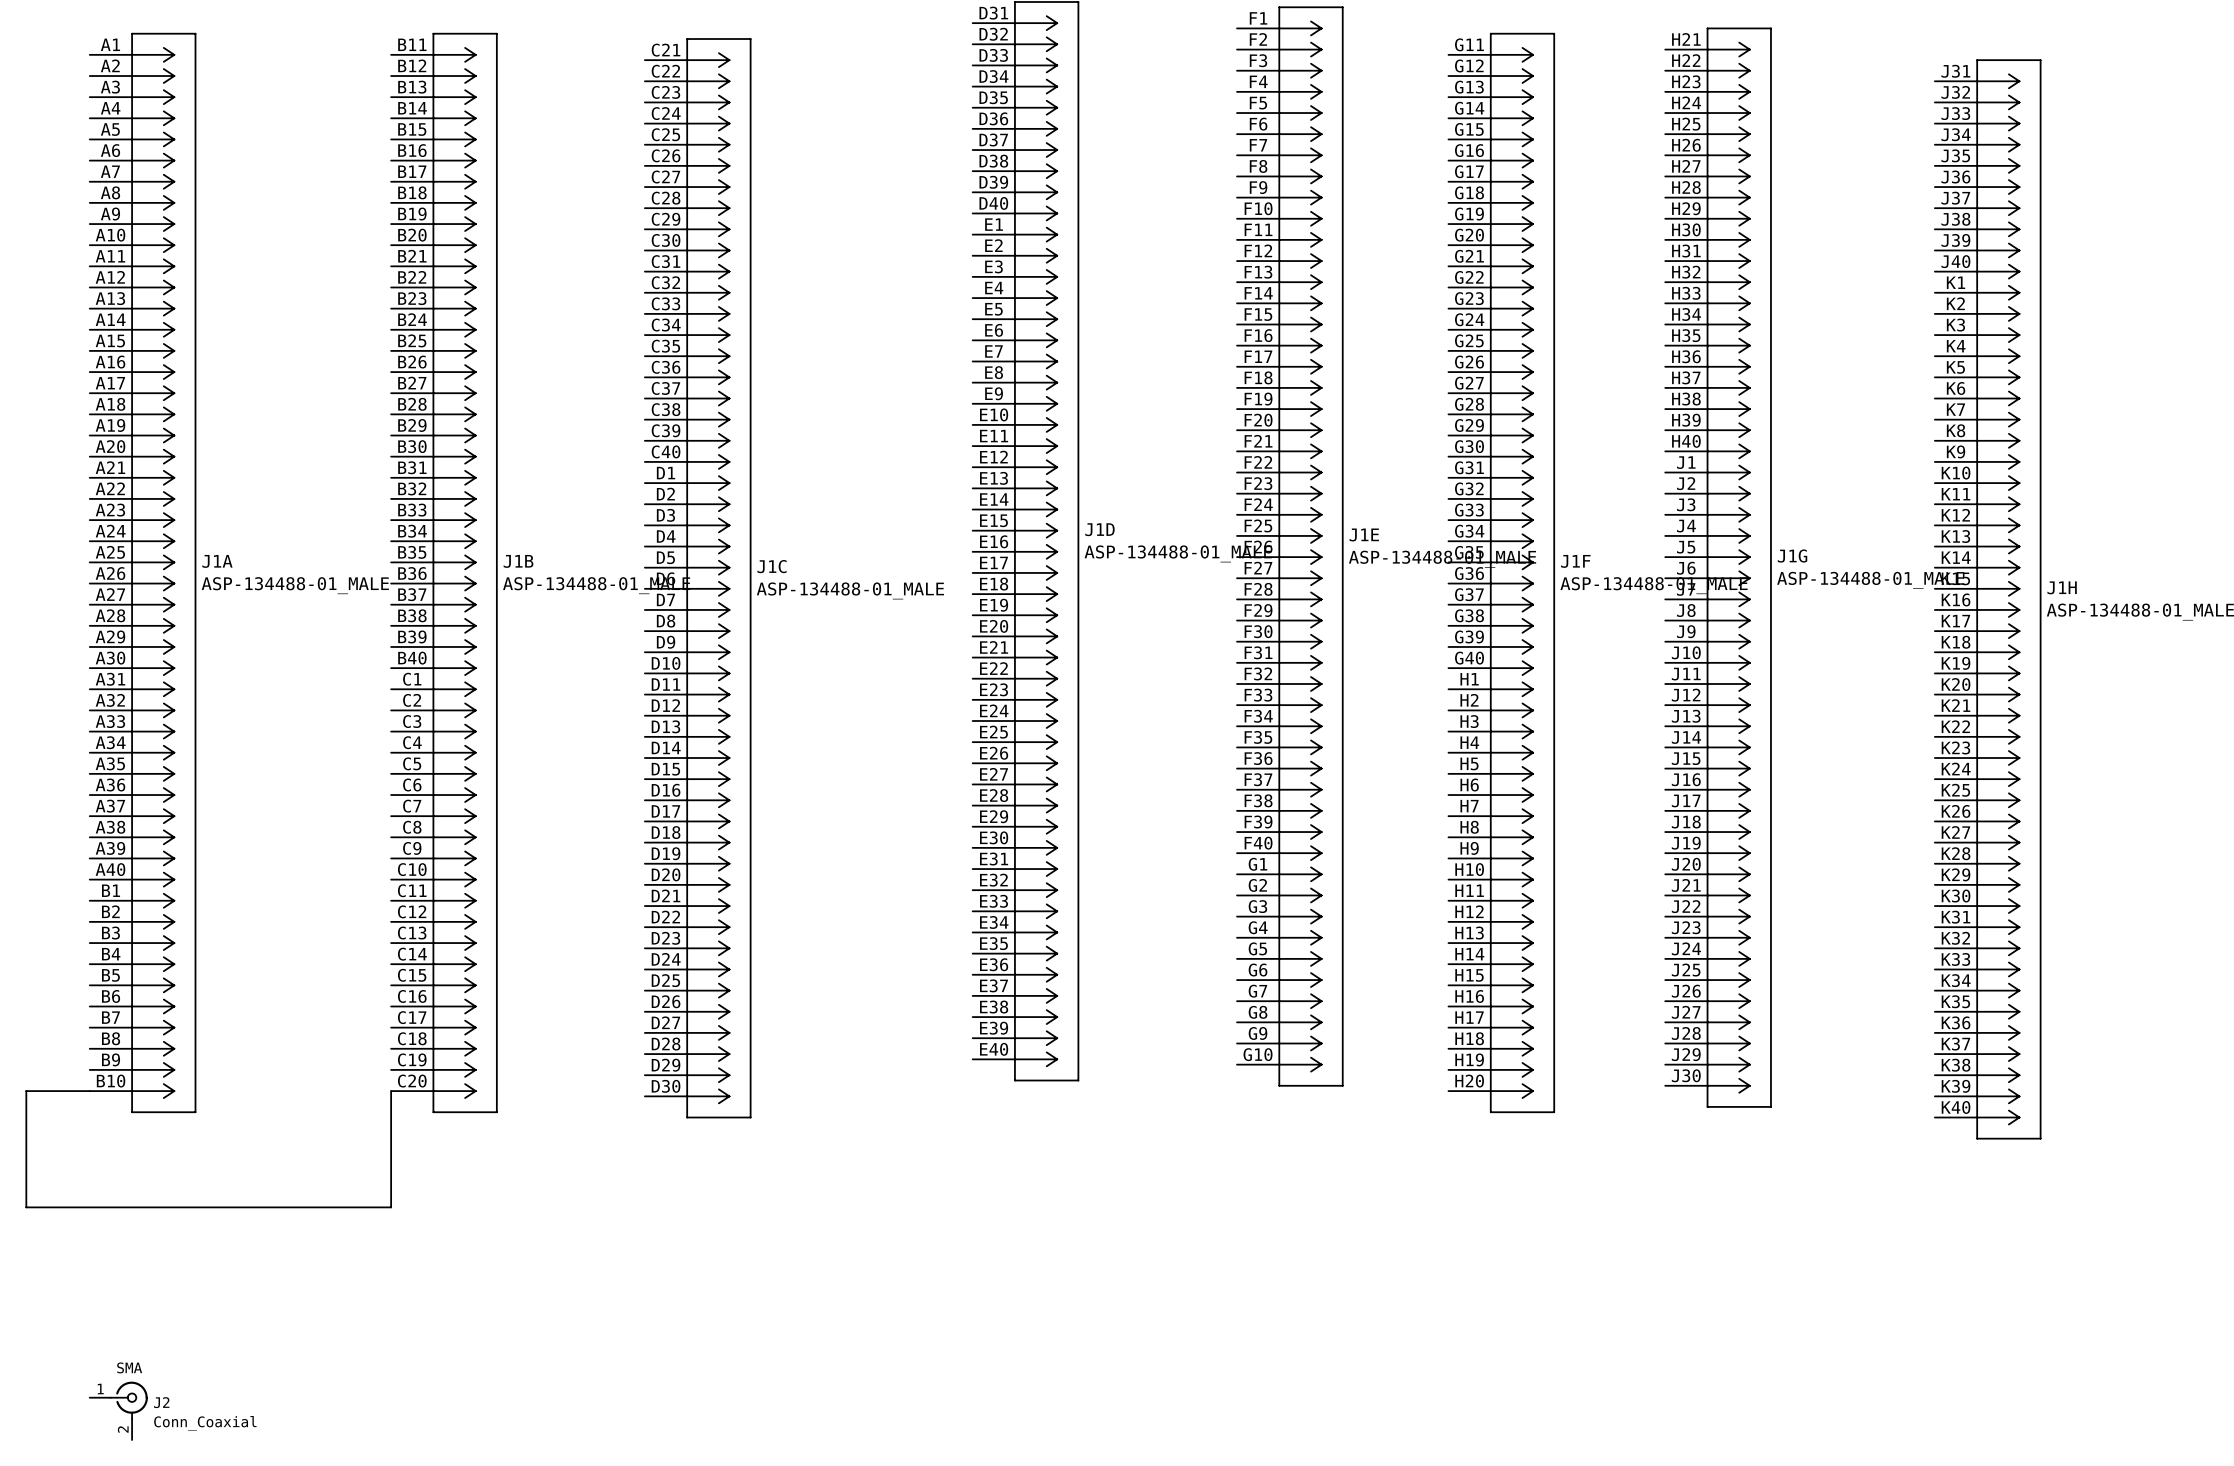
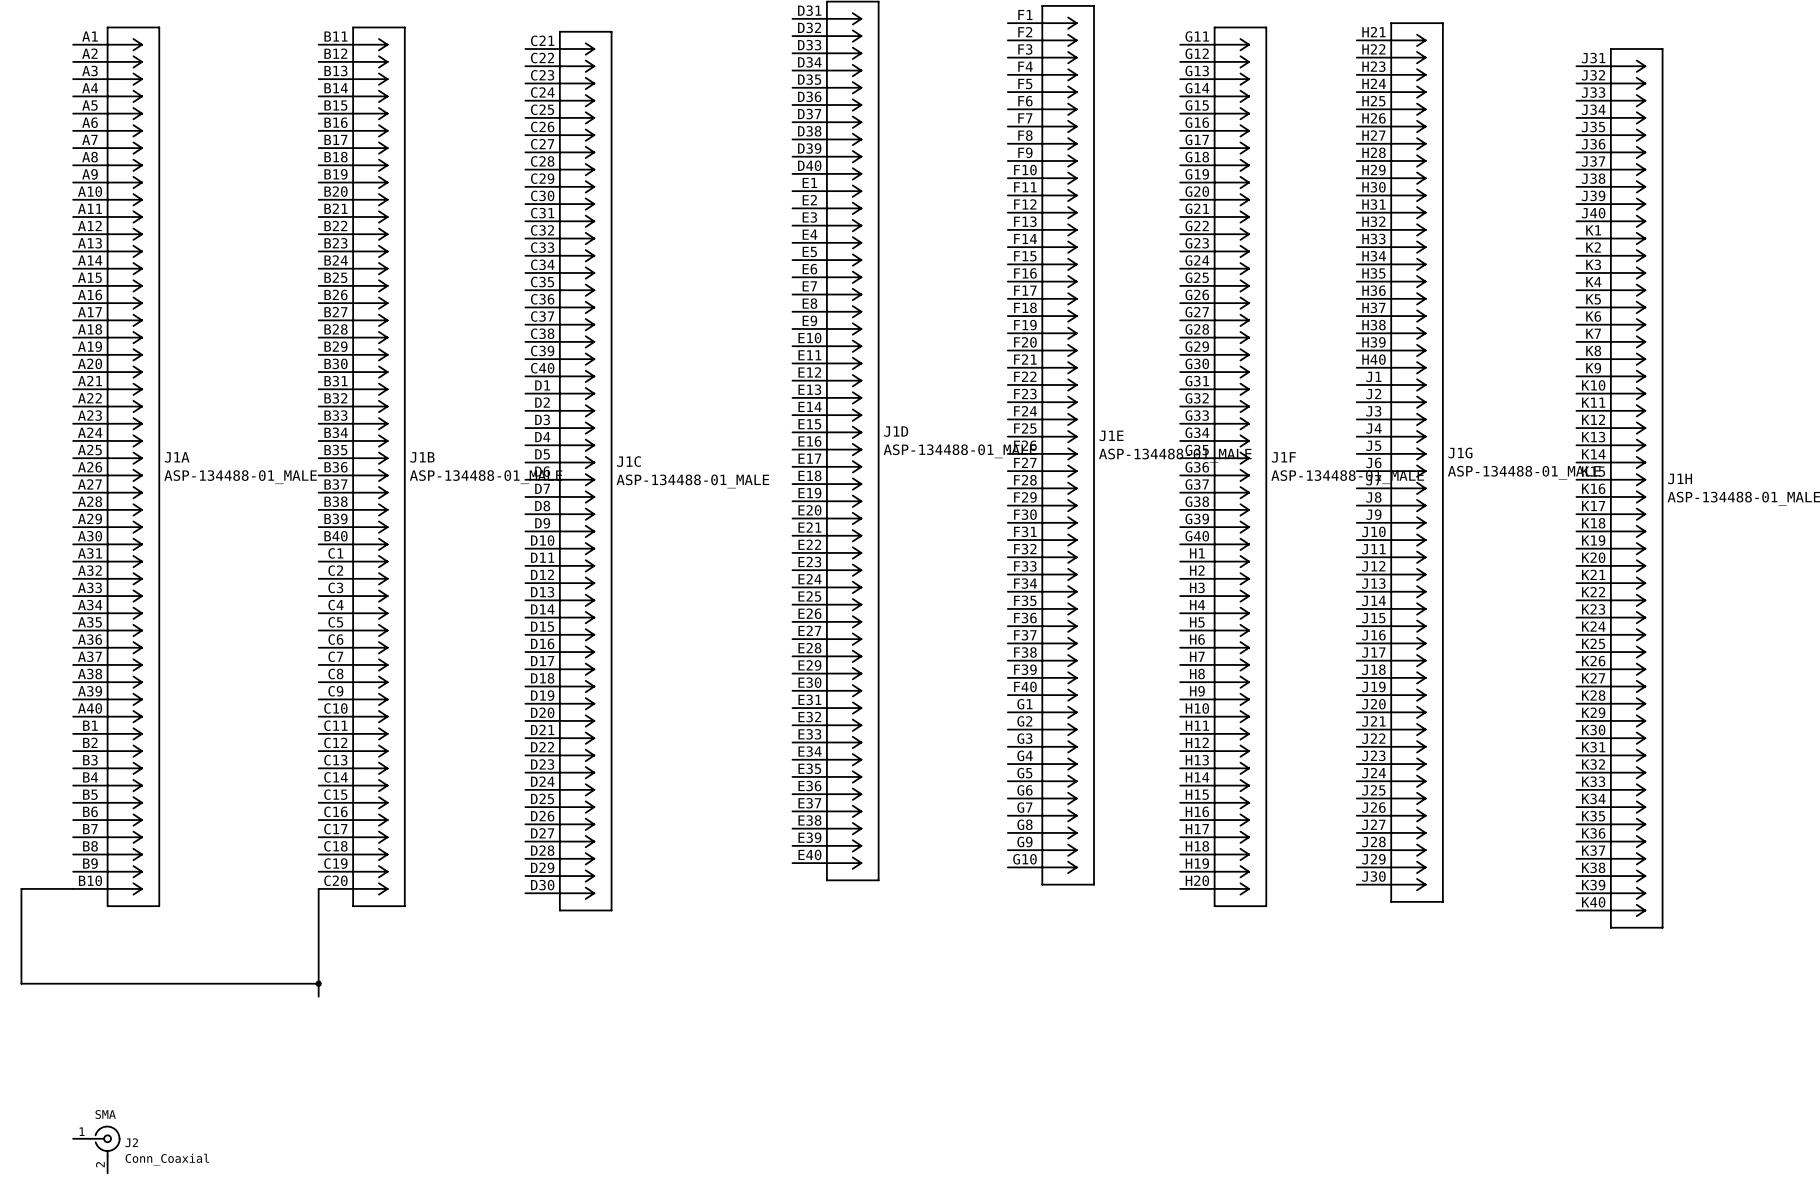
wire: none -> (318, 983) (318, 996)
junction: none -> (318, 983)

